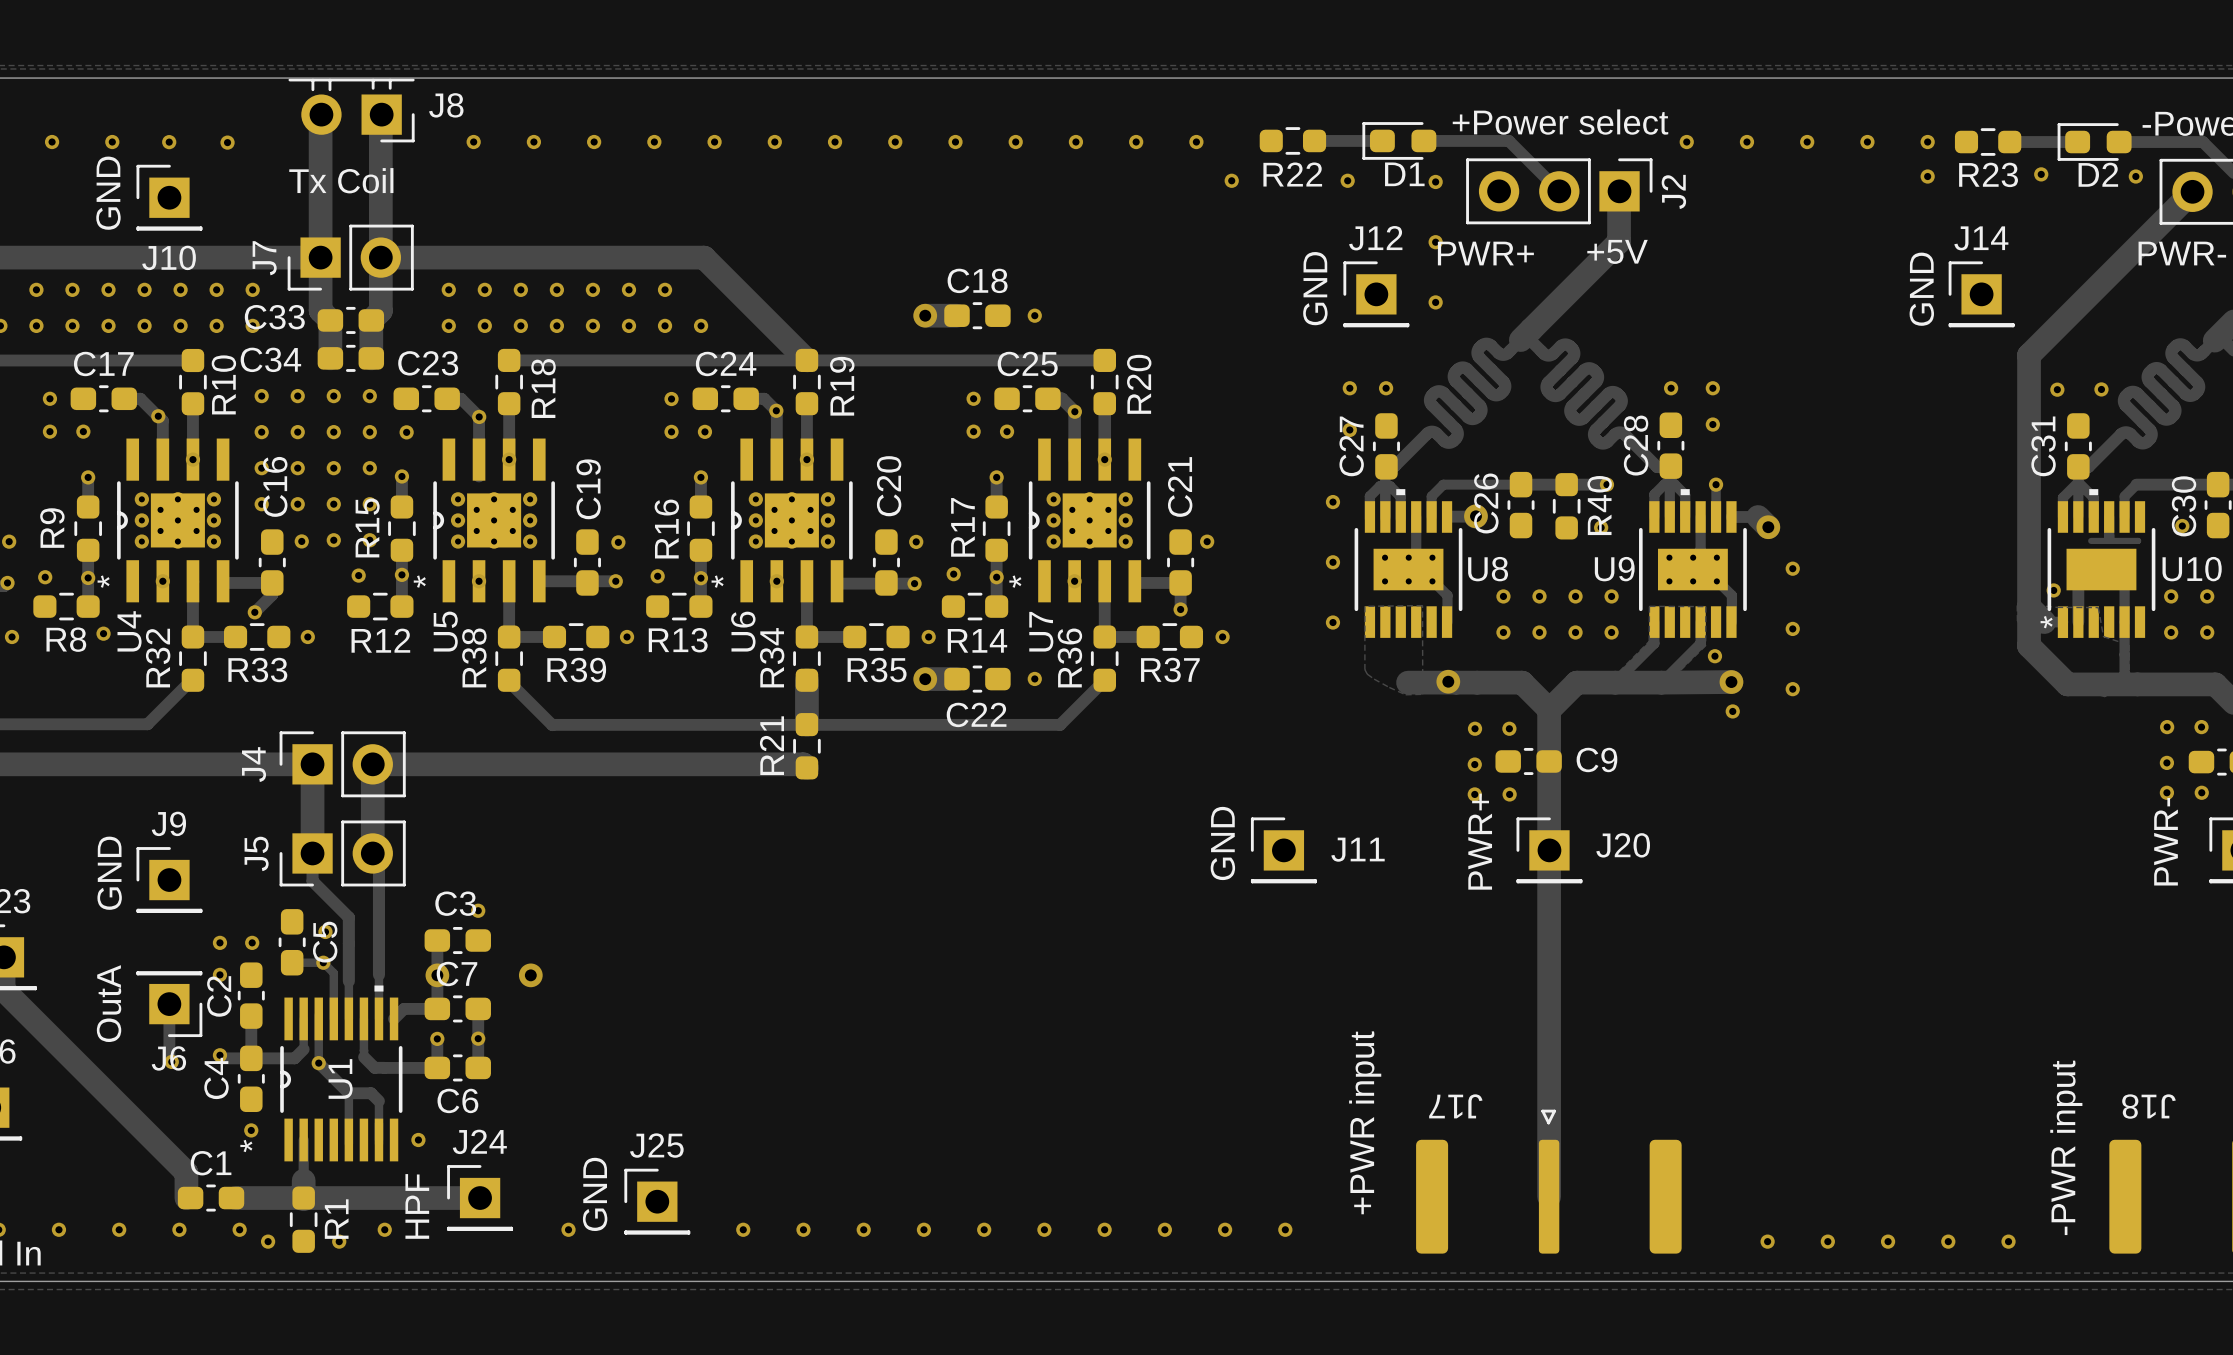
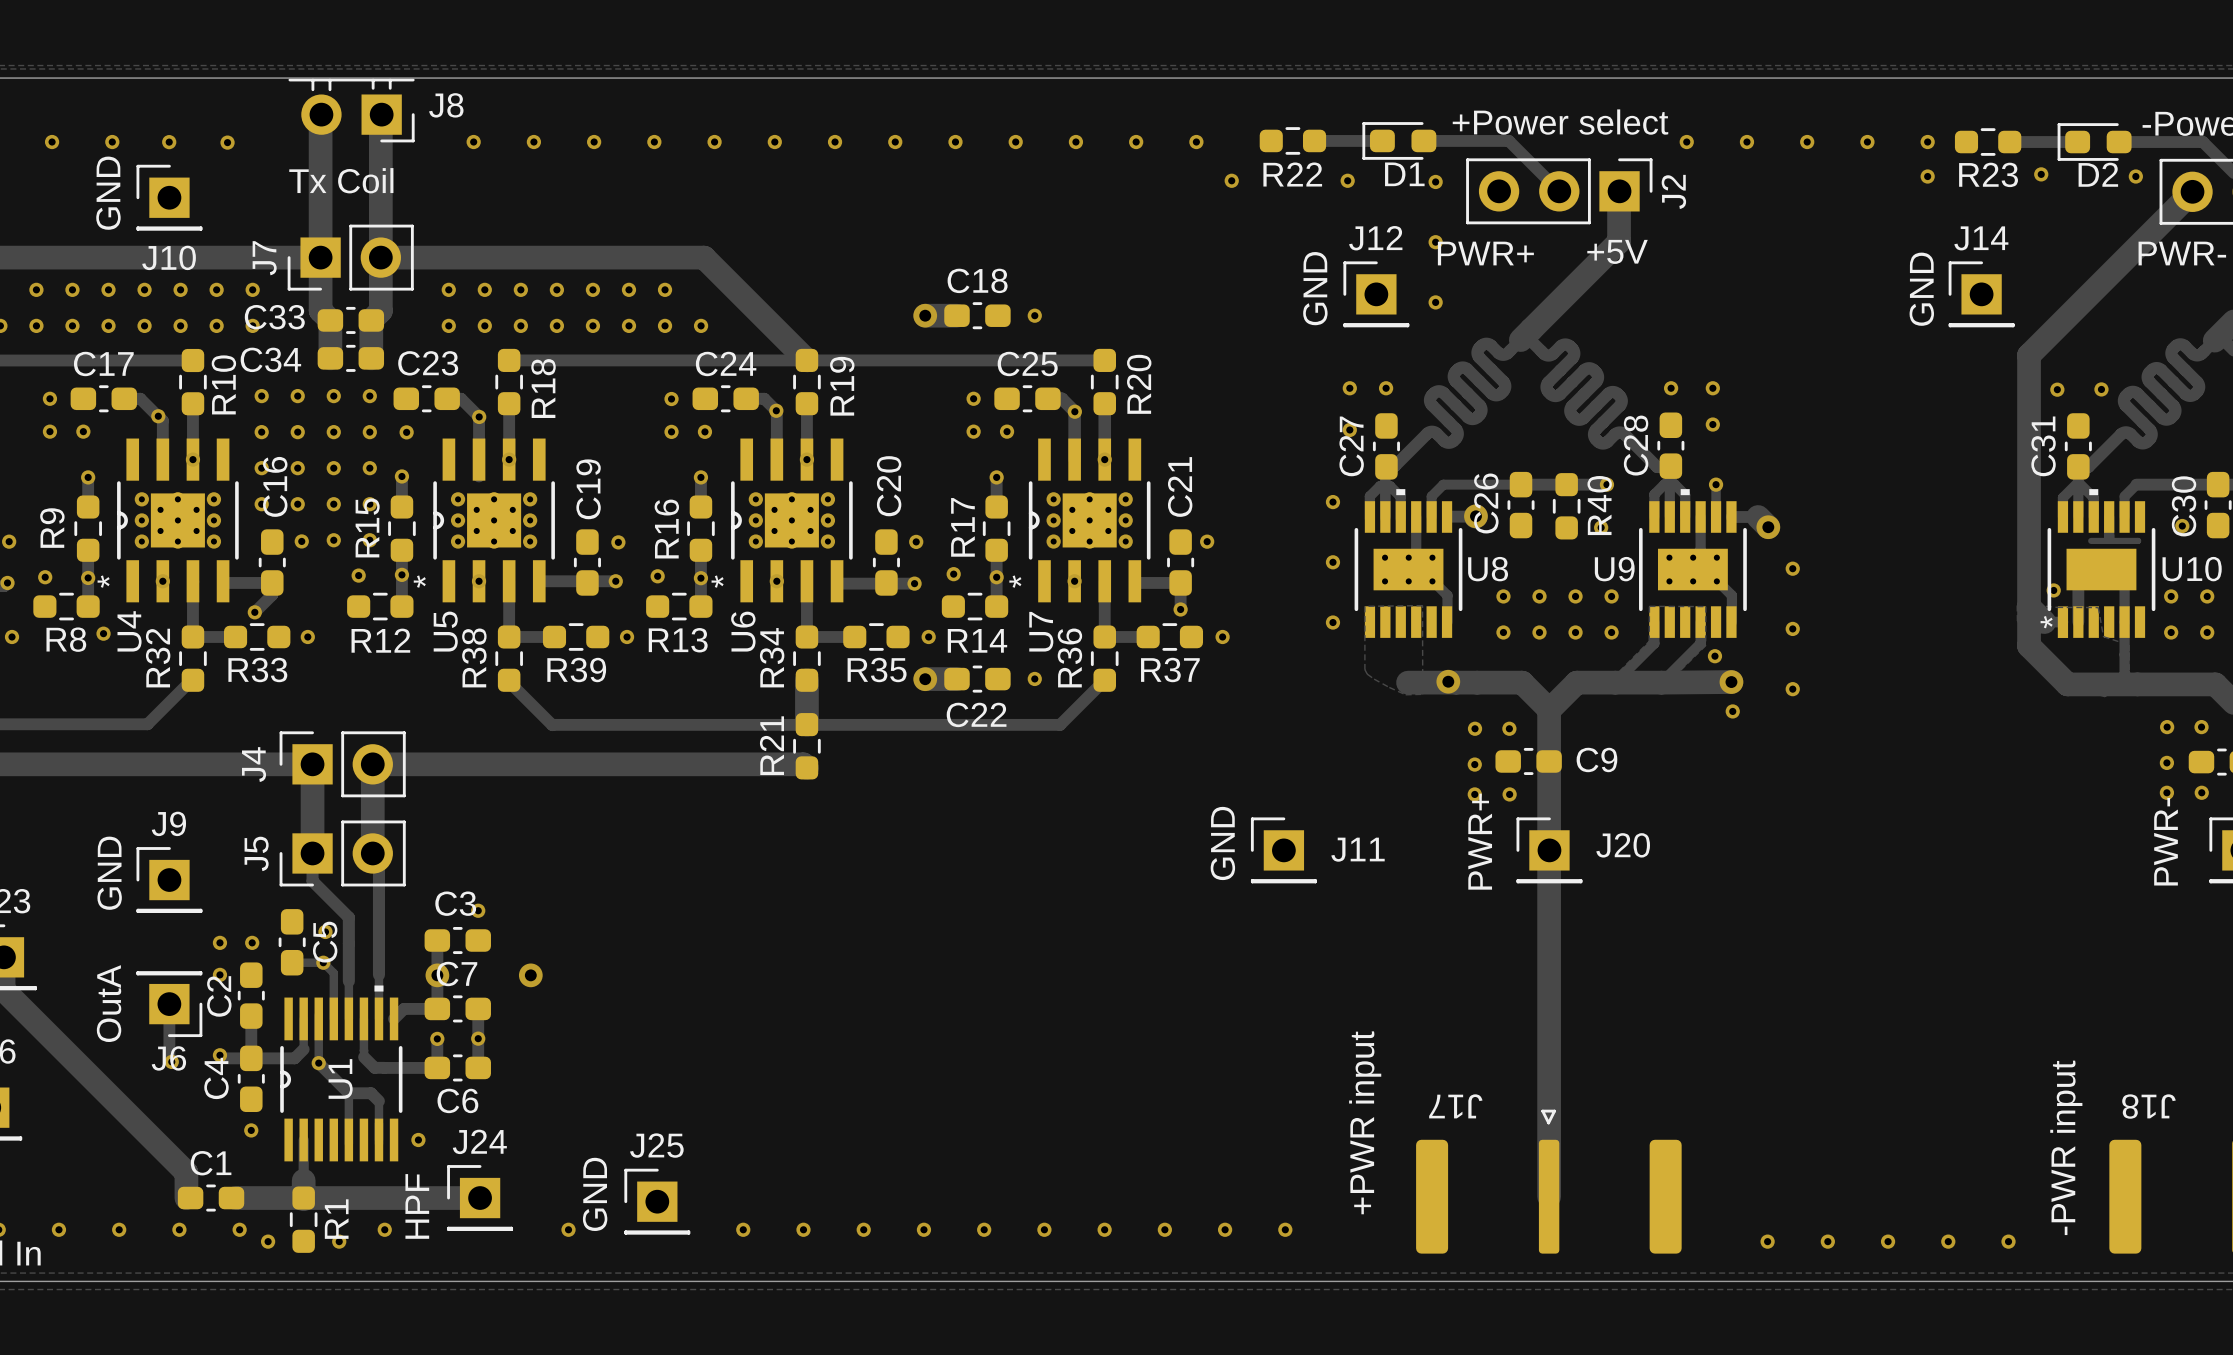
U1 text: * (246, 1146) -> none

